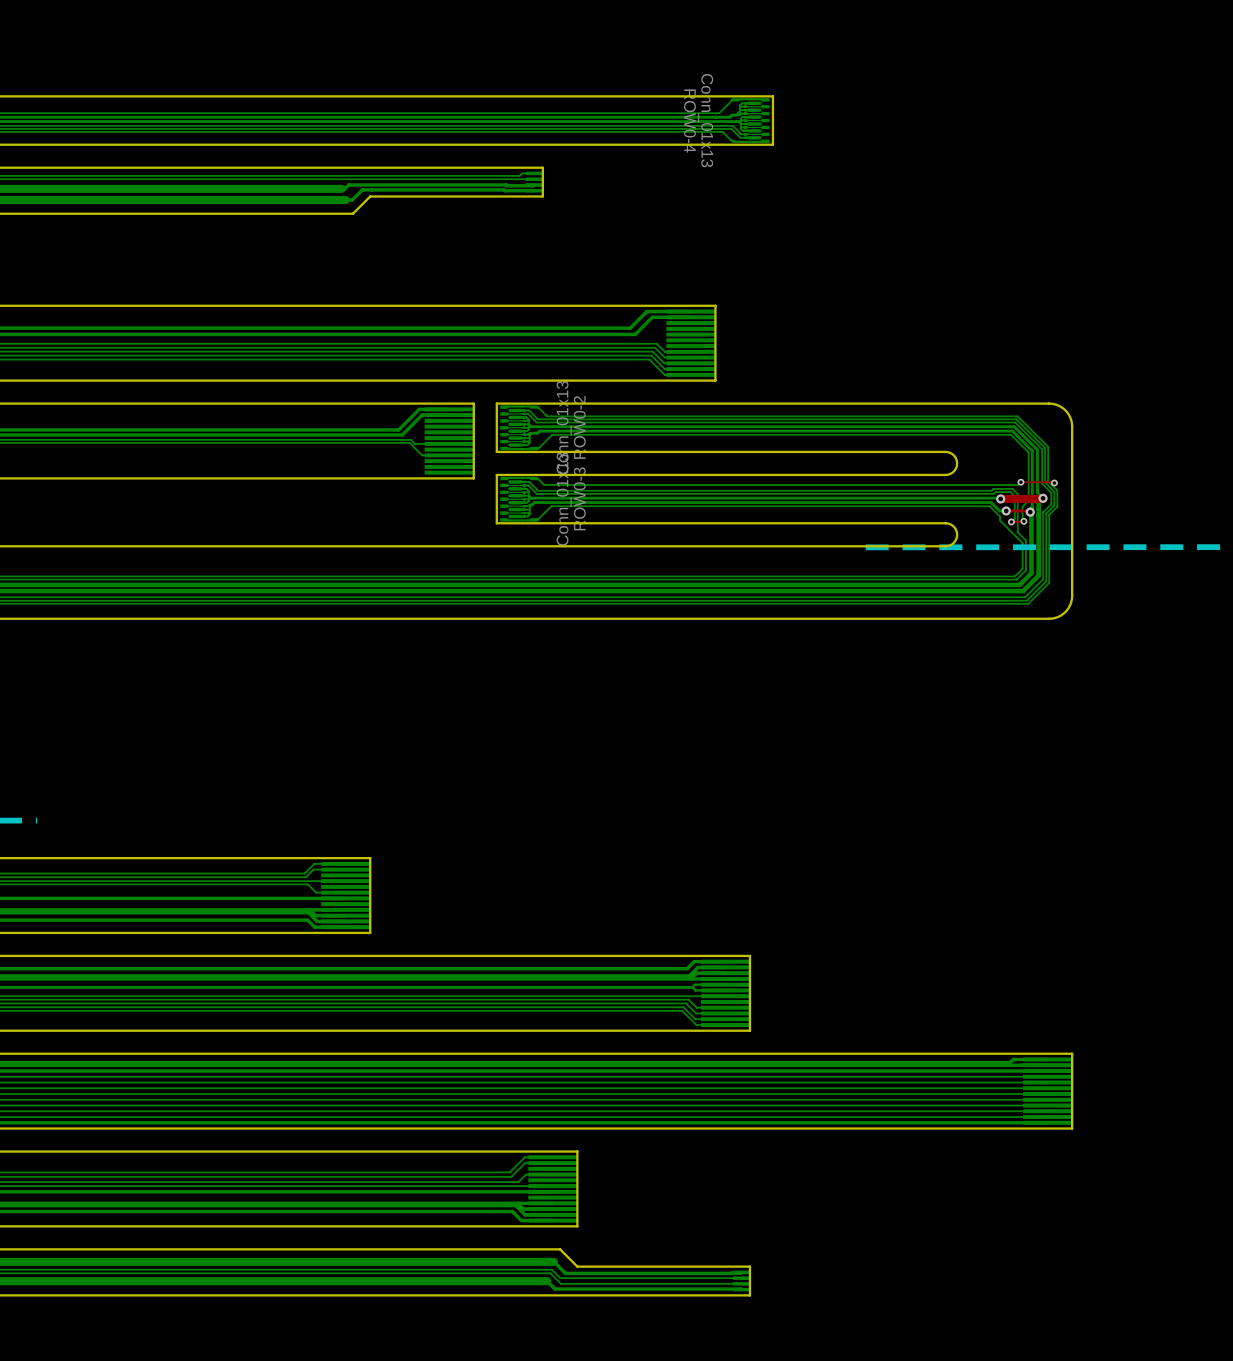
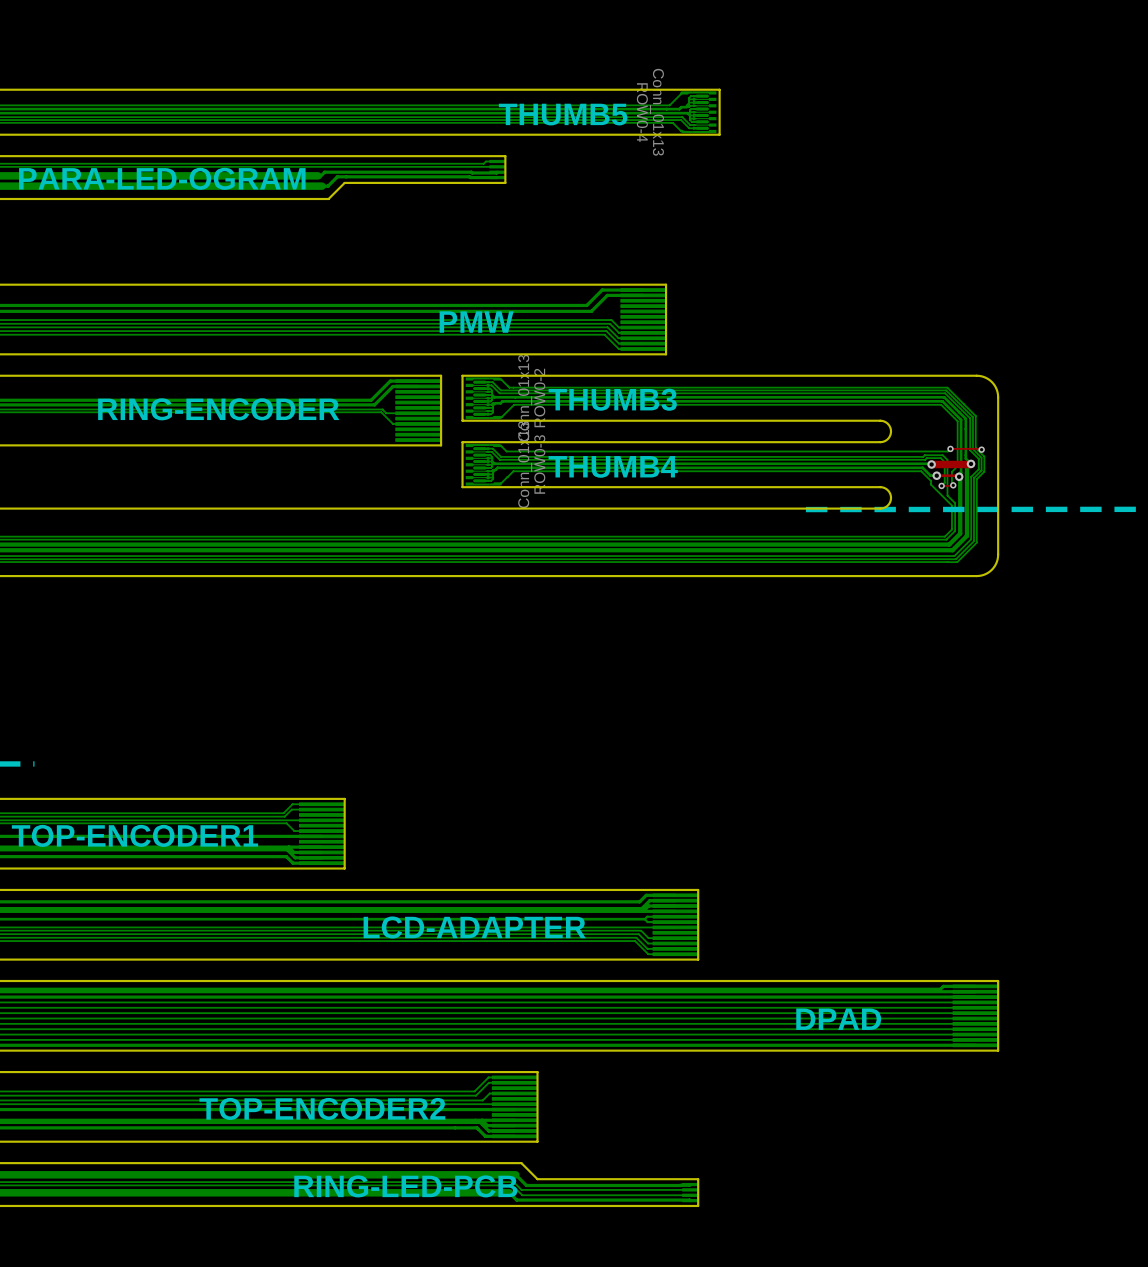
text: none -> THUMB5 (563, 114)
text: none -> PARA-LED-OGRAM (162, 178)
text: none -> PMW (476, 322)
text: none -> THUMB3 (612, 399)
text: none -> RING-ENCODER (218, 409)
text: none -> THUMB4 (613, 466)
text: none -> TOP-ENCODER1 (134, 835)
text: none -> LCD-ADAPTER (474, 927)
text: none -> DPAD (838, 1019)
text: none -> TOP-ENCODER2 (322, 1108)
text: none -> RING-LED-PCB (405, 1186)

